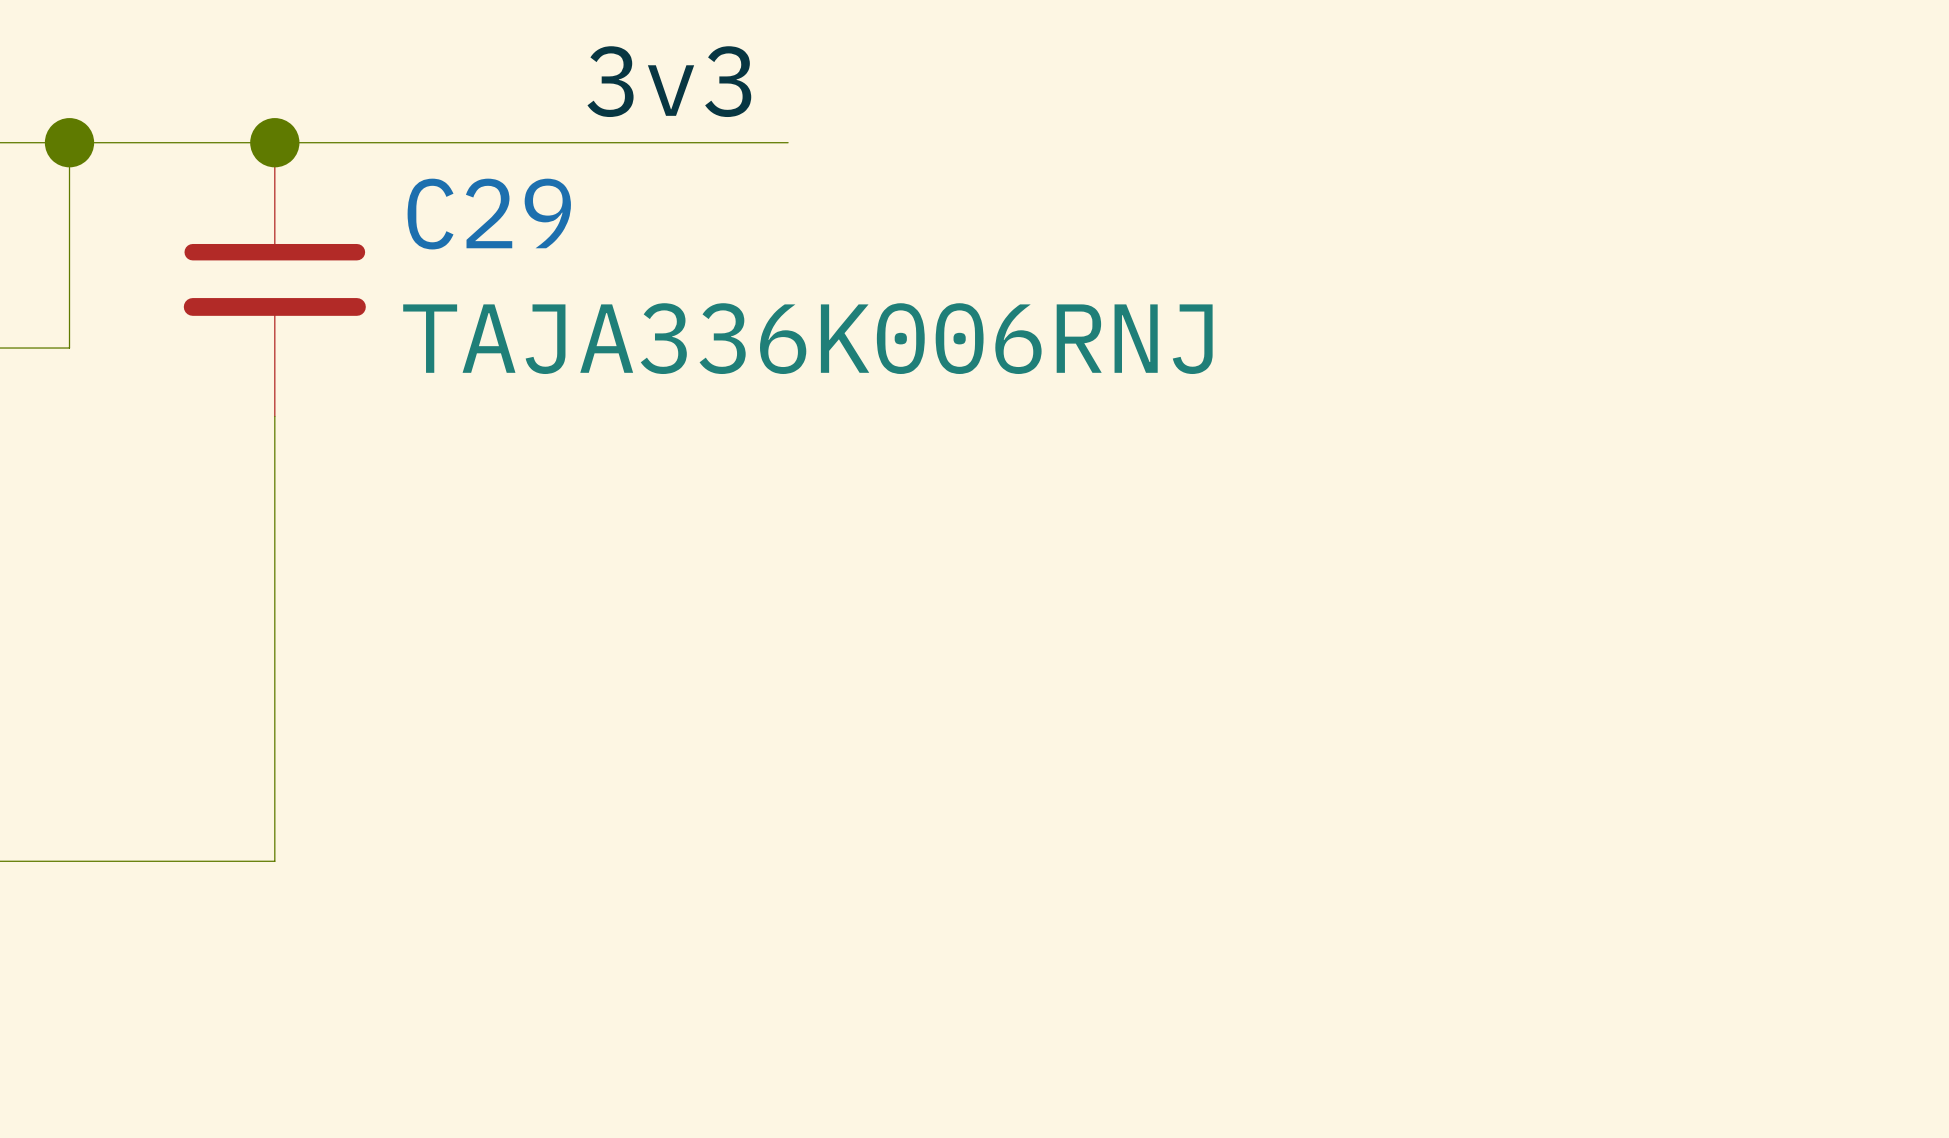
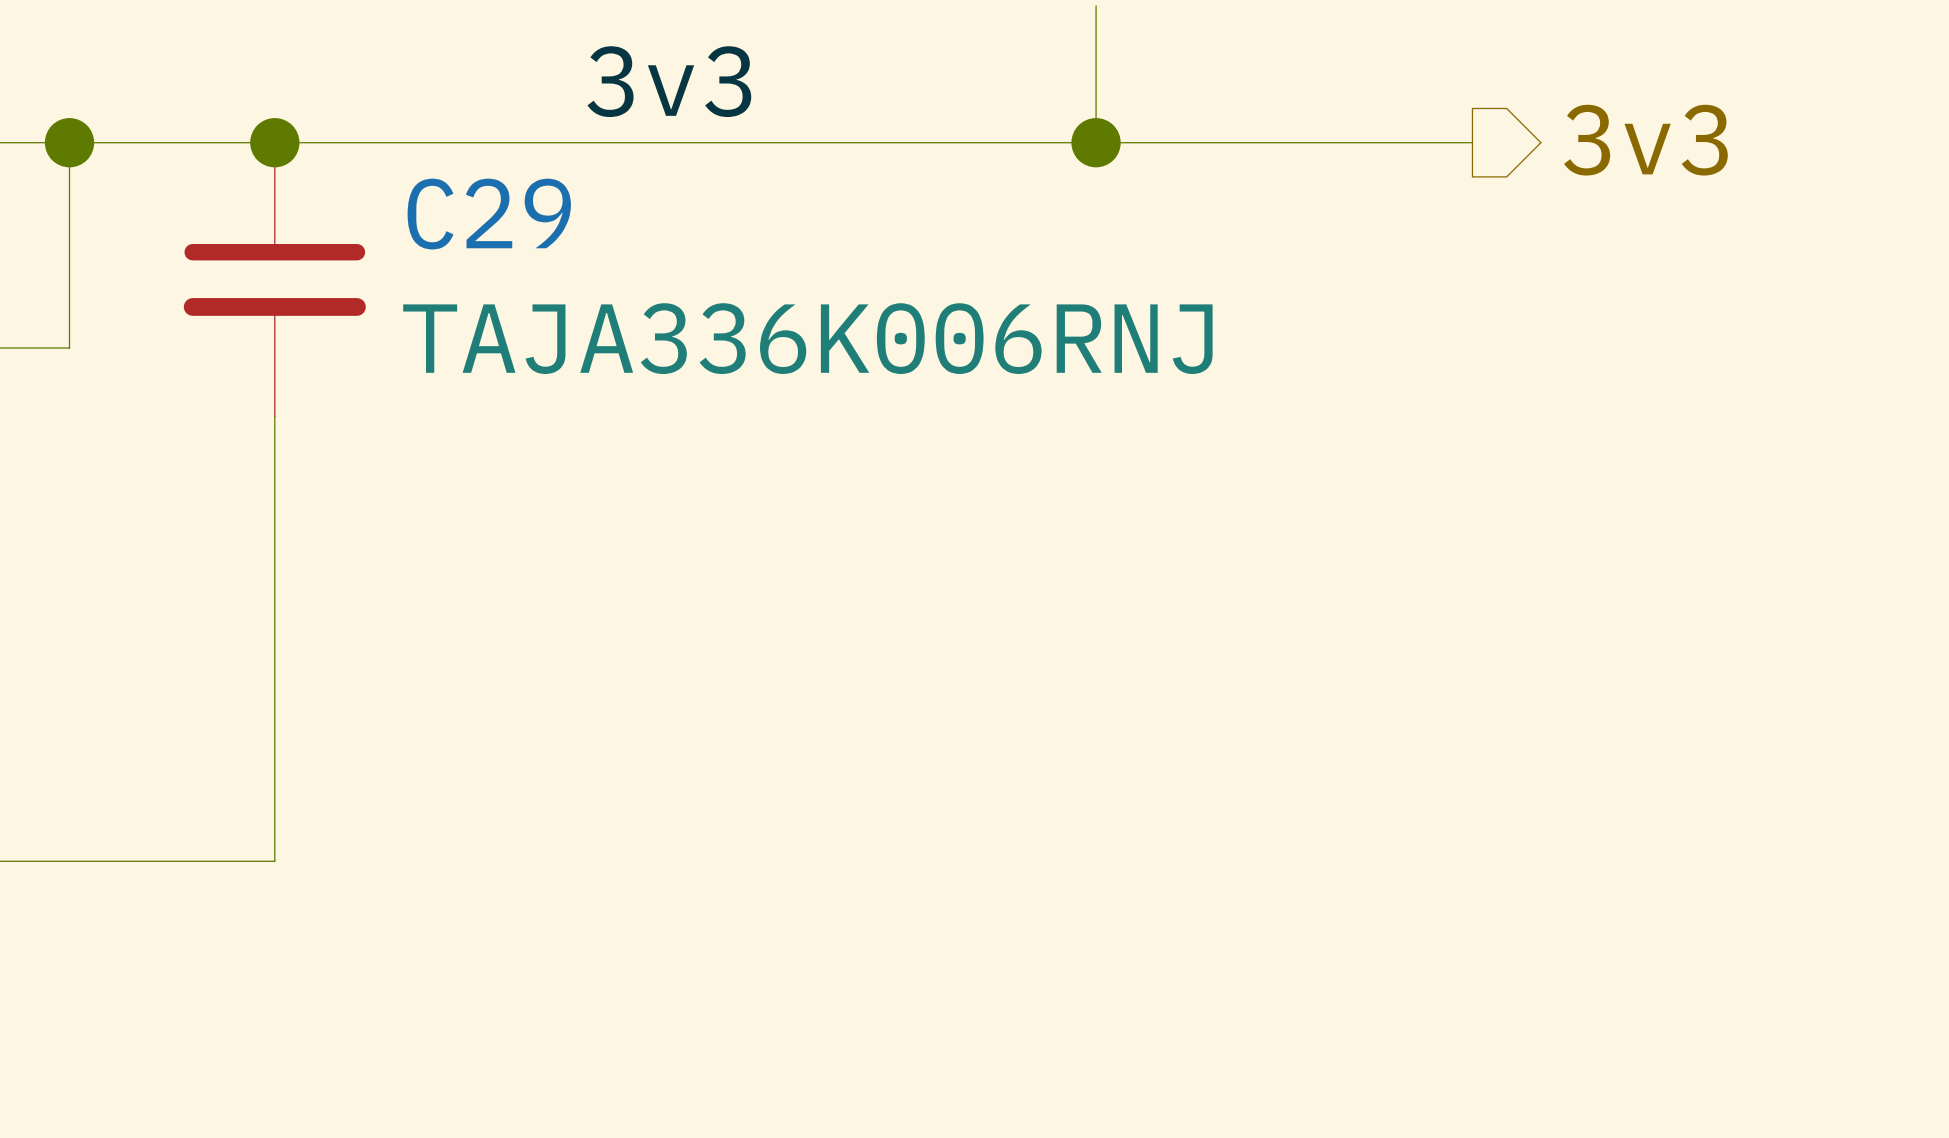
wire: none -> (1096, 5) (1096, 142)
hierarchical label: none -> 3v3 (1645, 140)
wire: none -> (788, 142) (1472, 142)
junction: none -> (1096, 142)

